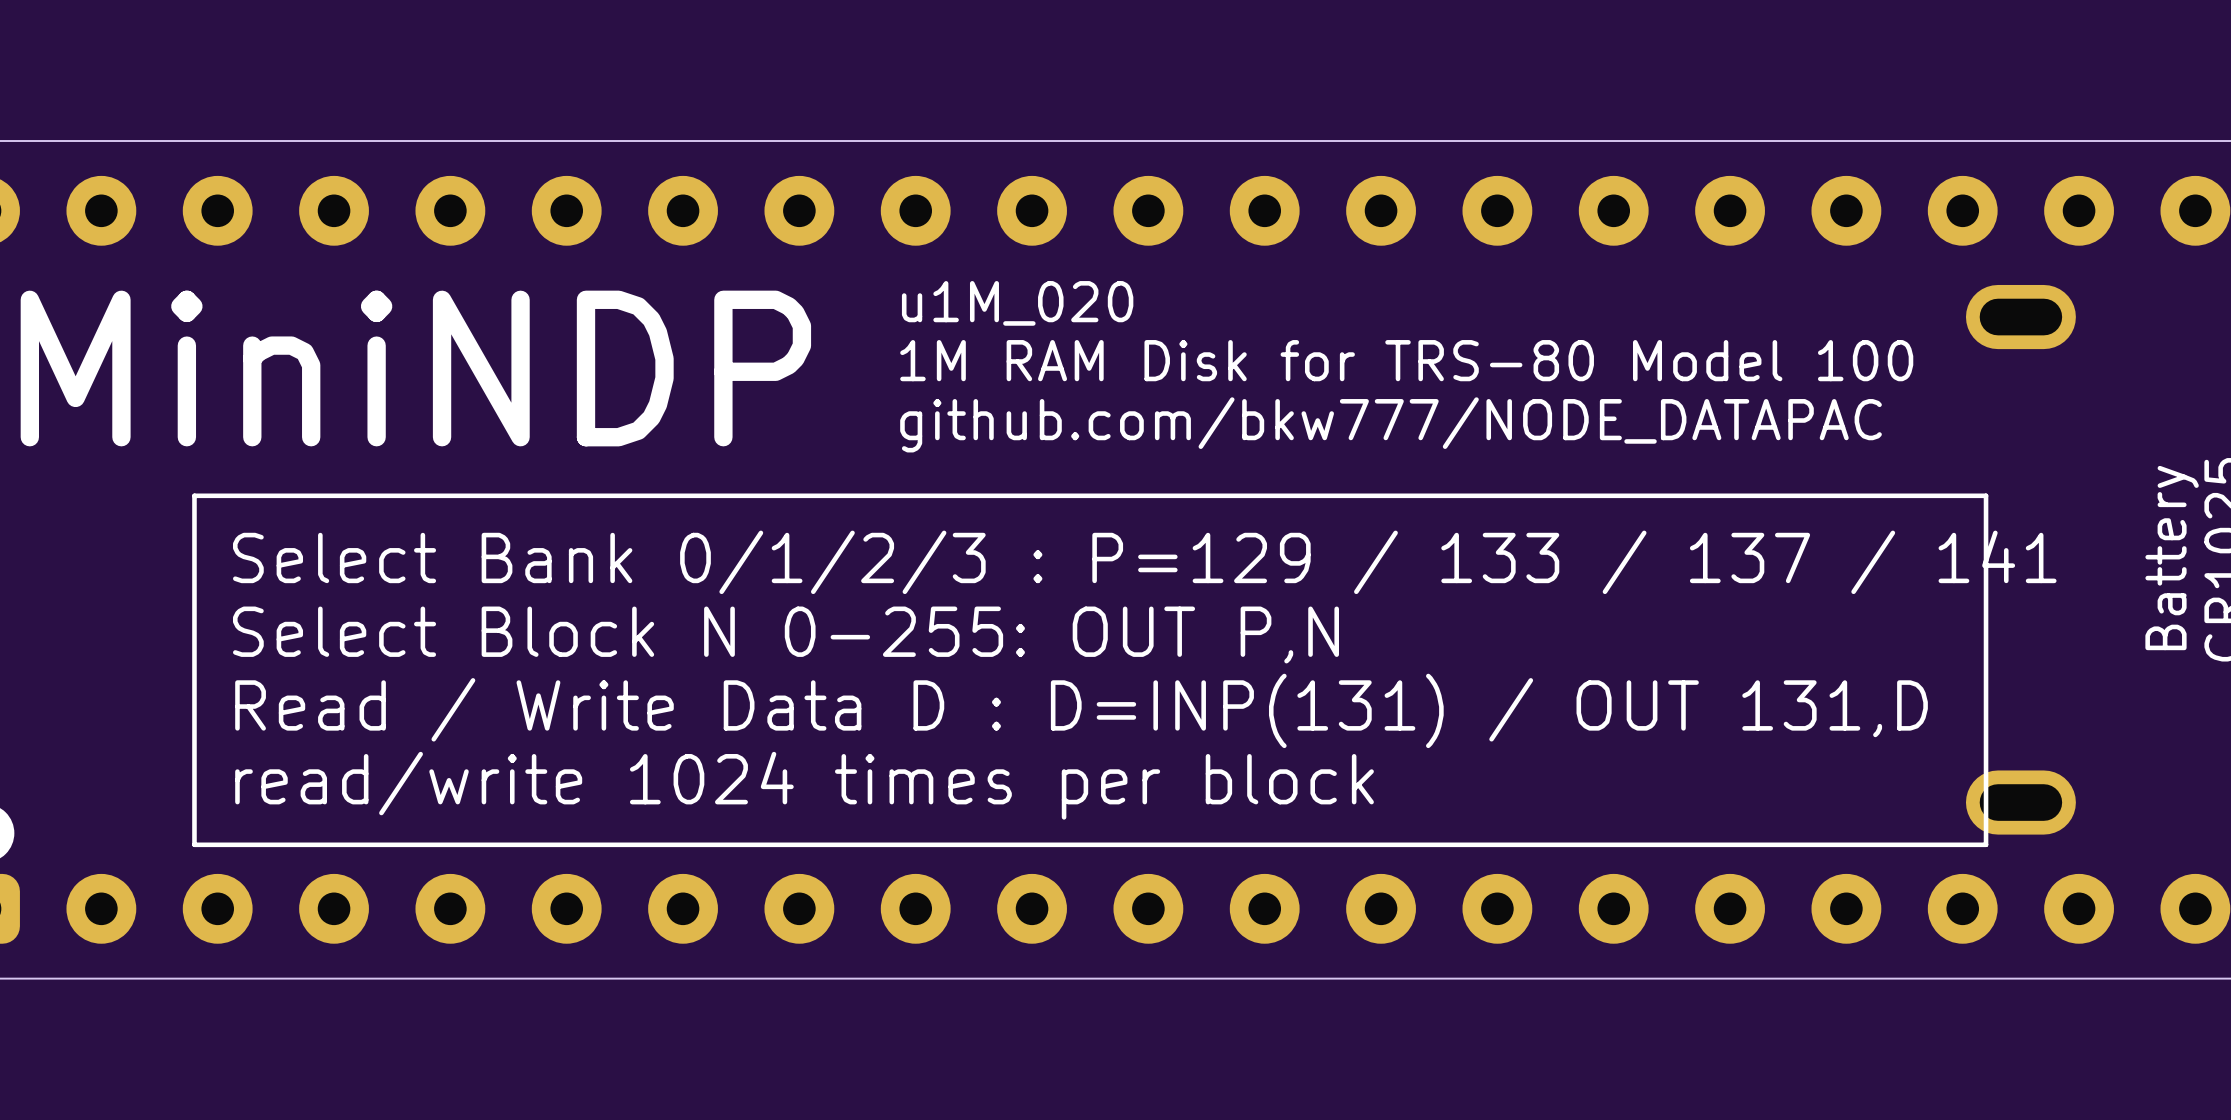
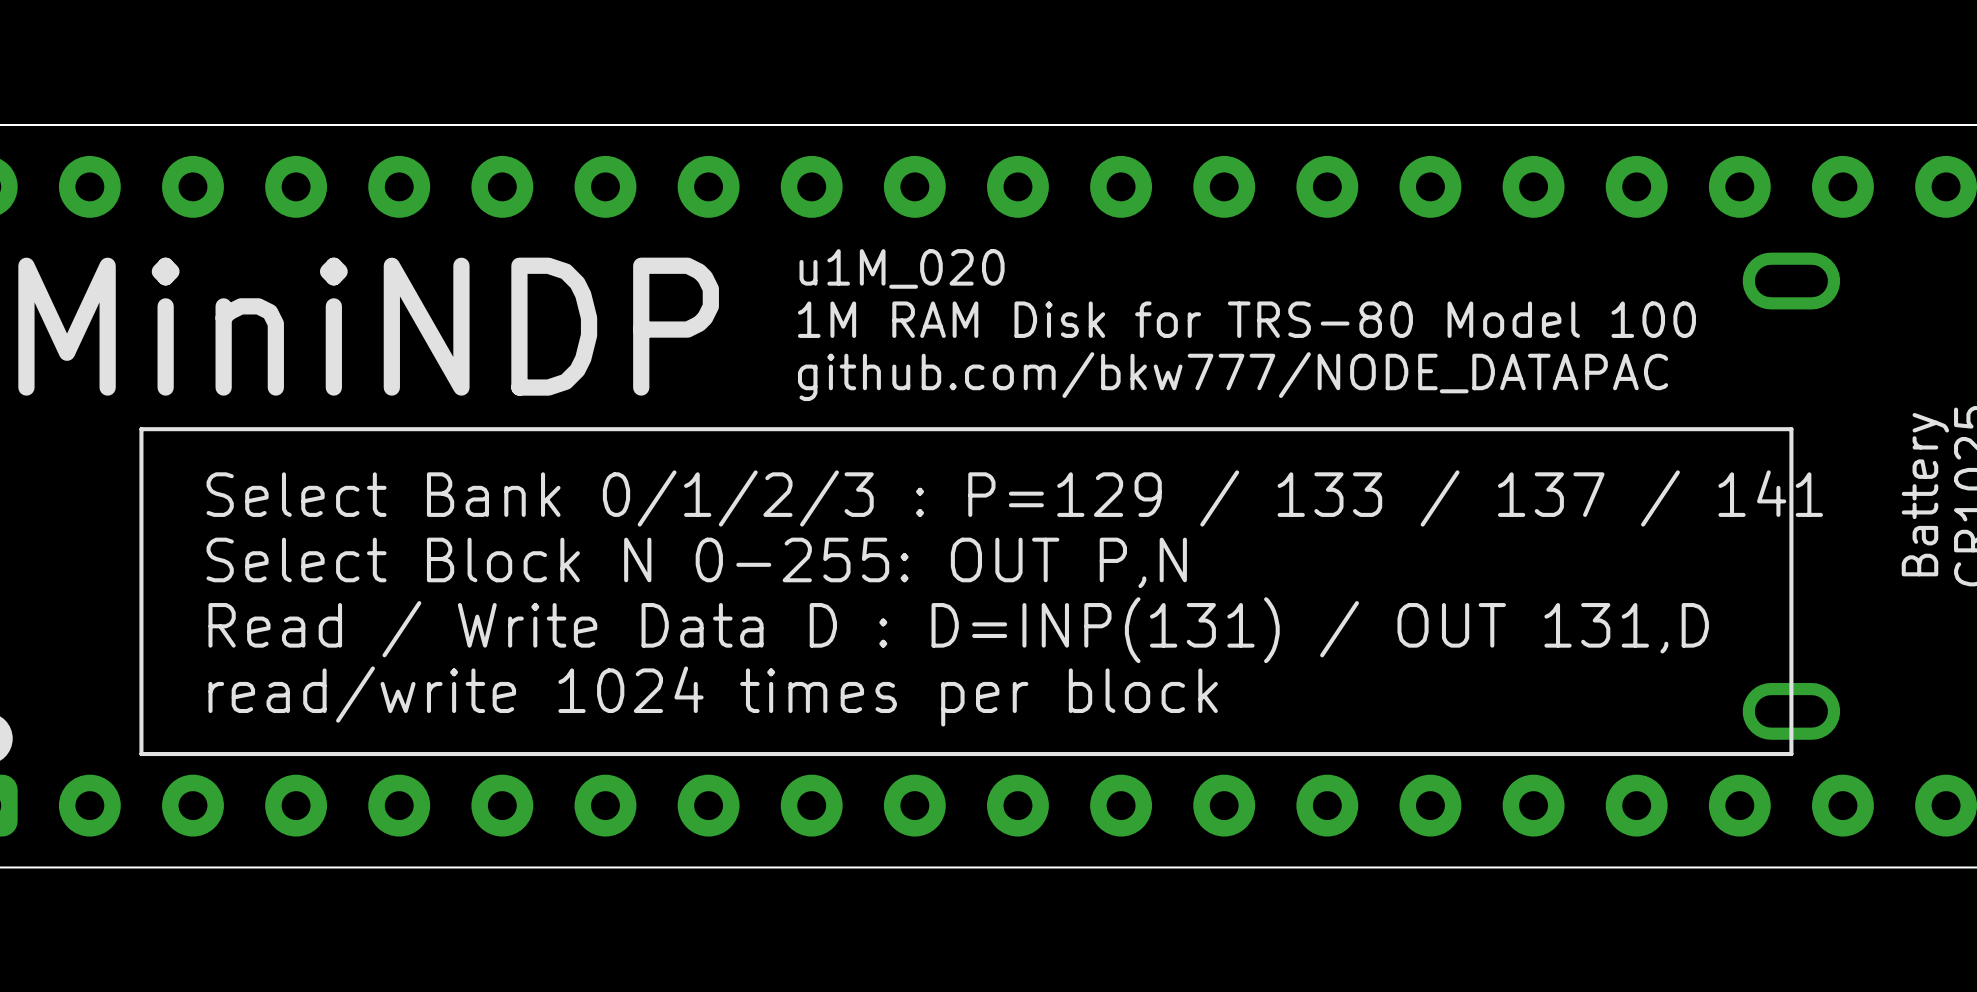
line: (194, 495) (1986, 495) (1986, 844) (194, 844) (194, 495) -> (141, 429) (141, 754) (1791, 754) (1791, 429) (141, 429)

